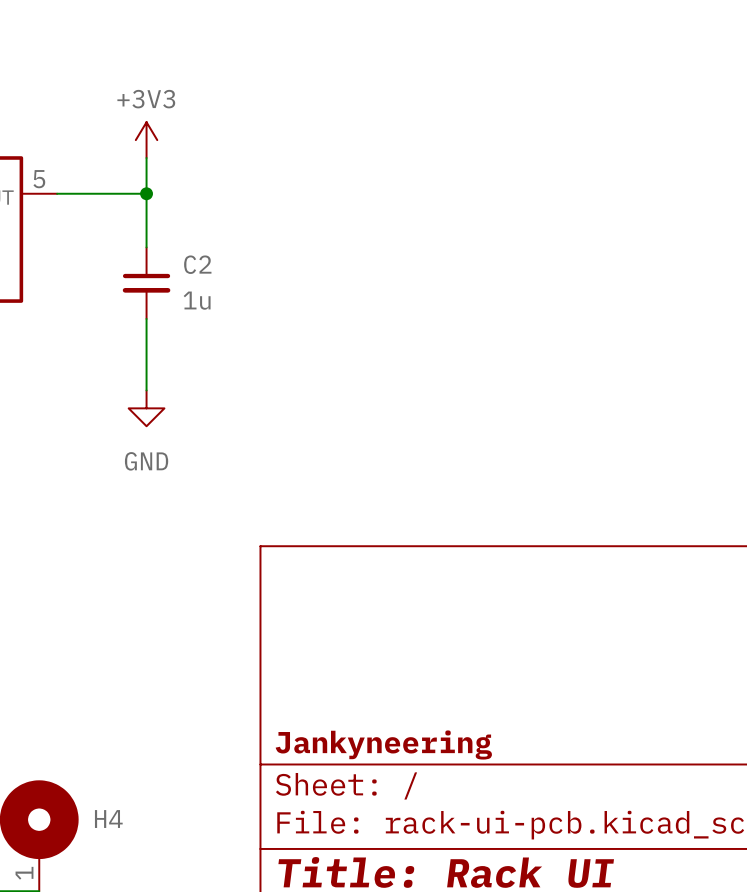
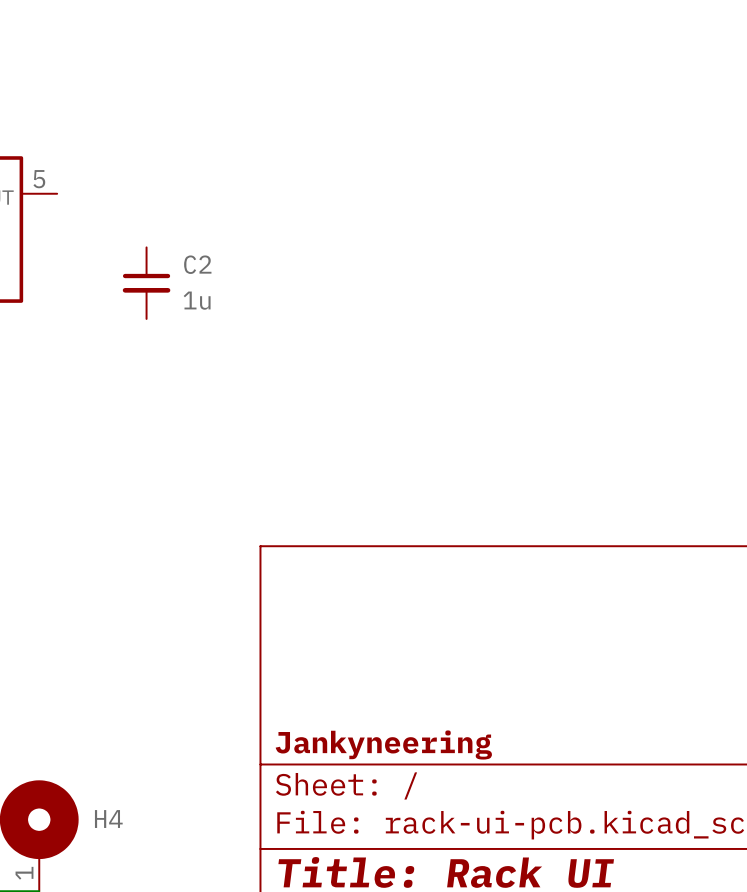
power symbol: +3V3 (146, 140) -> none
wire: (146, 157) (146, 247) -> none
wire: (57, 193) (146, 193) -> none
junction: (146, 193) -> none
wire: (146, 318) (146, 390) -> none
power symbol: GND (146, 408) -> none

